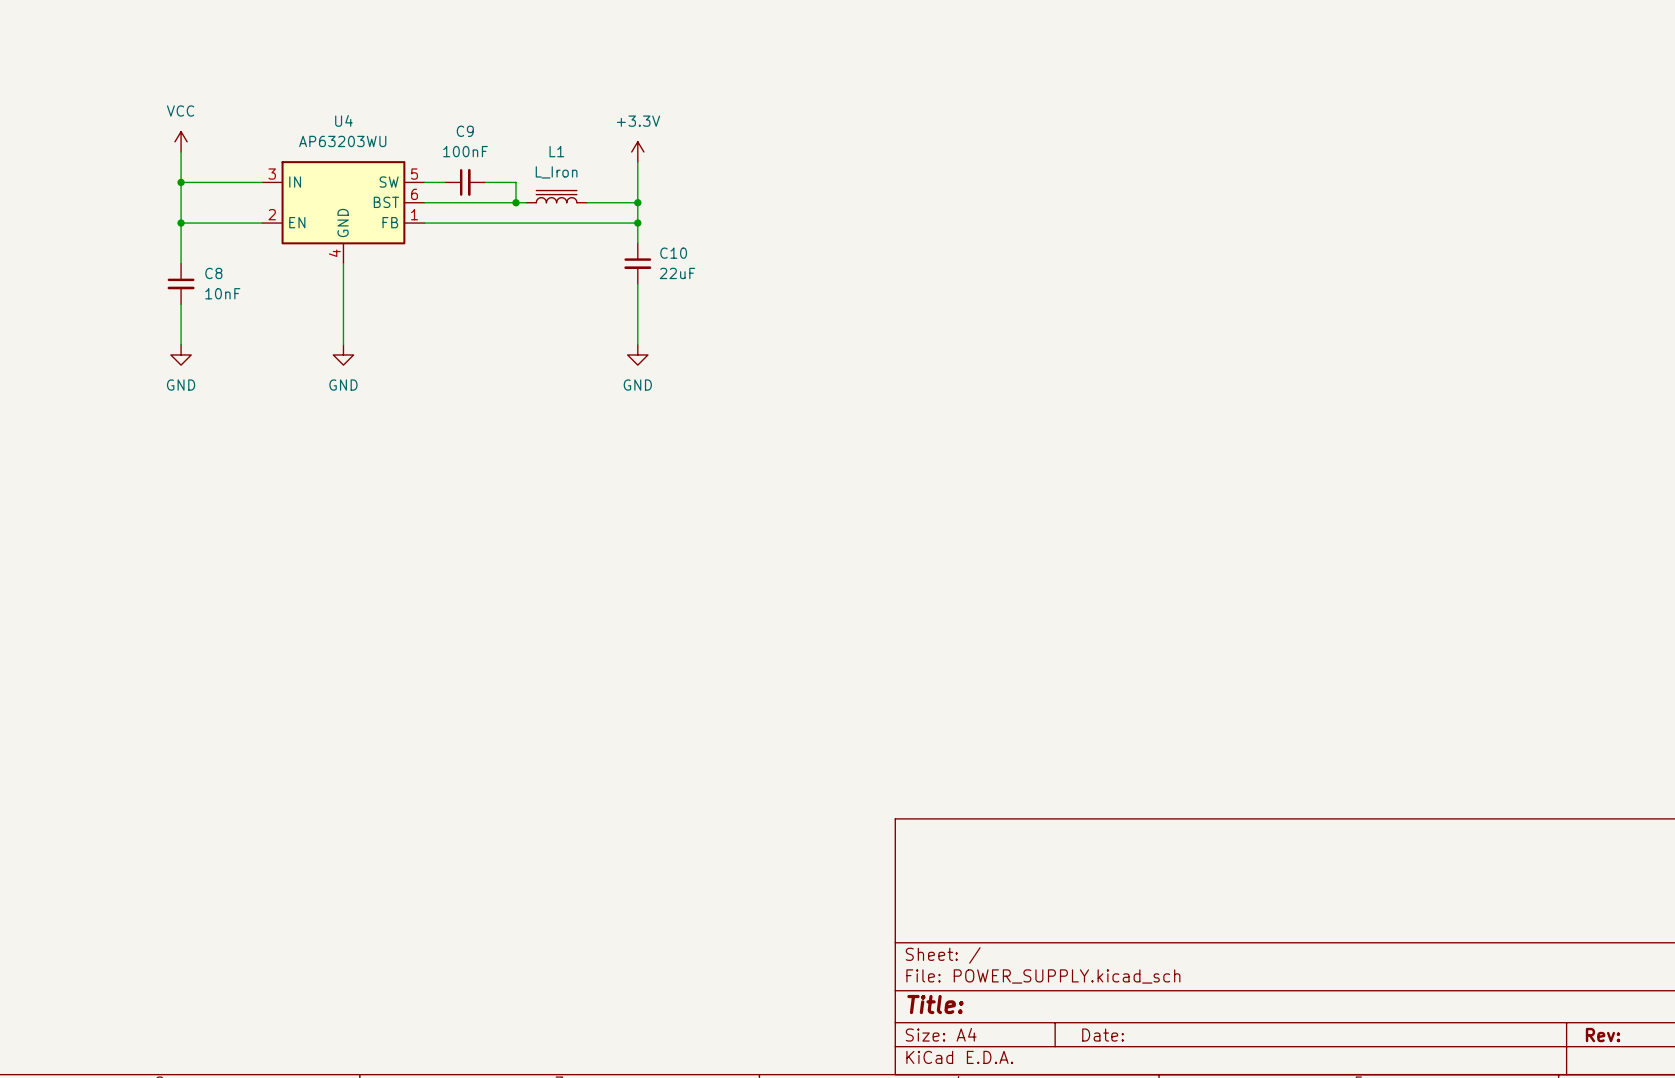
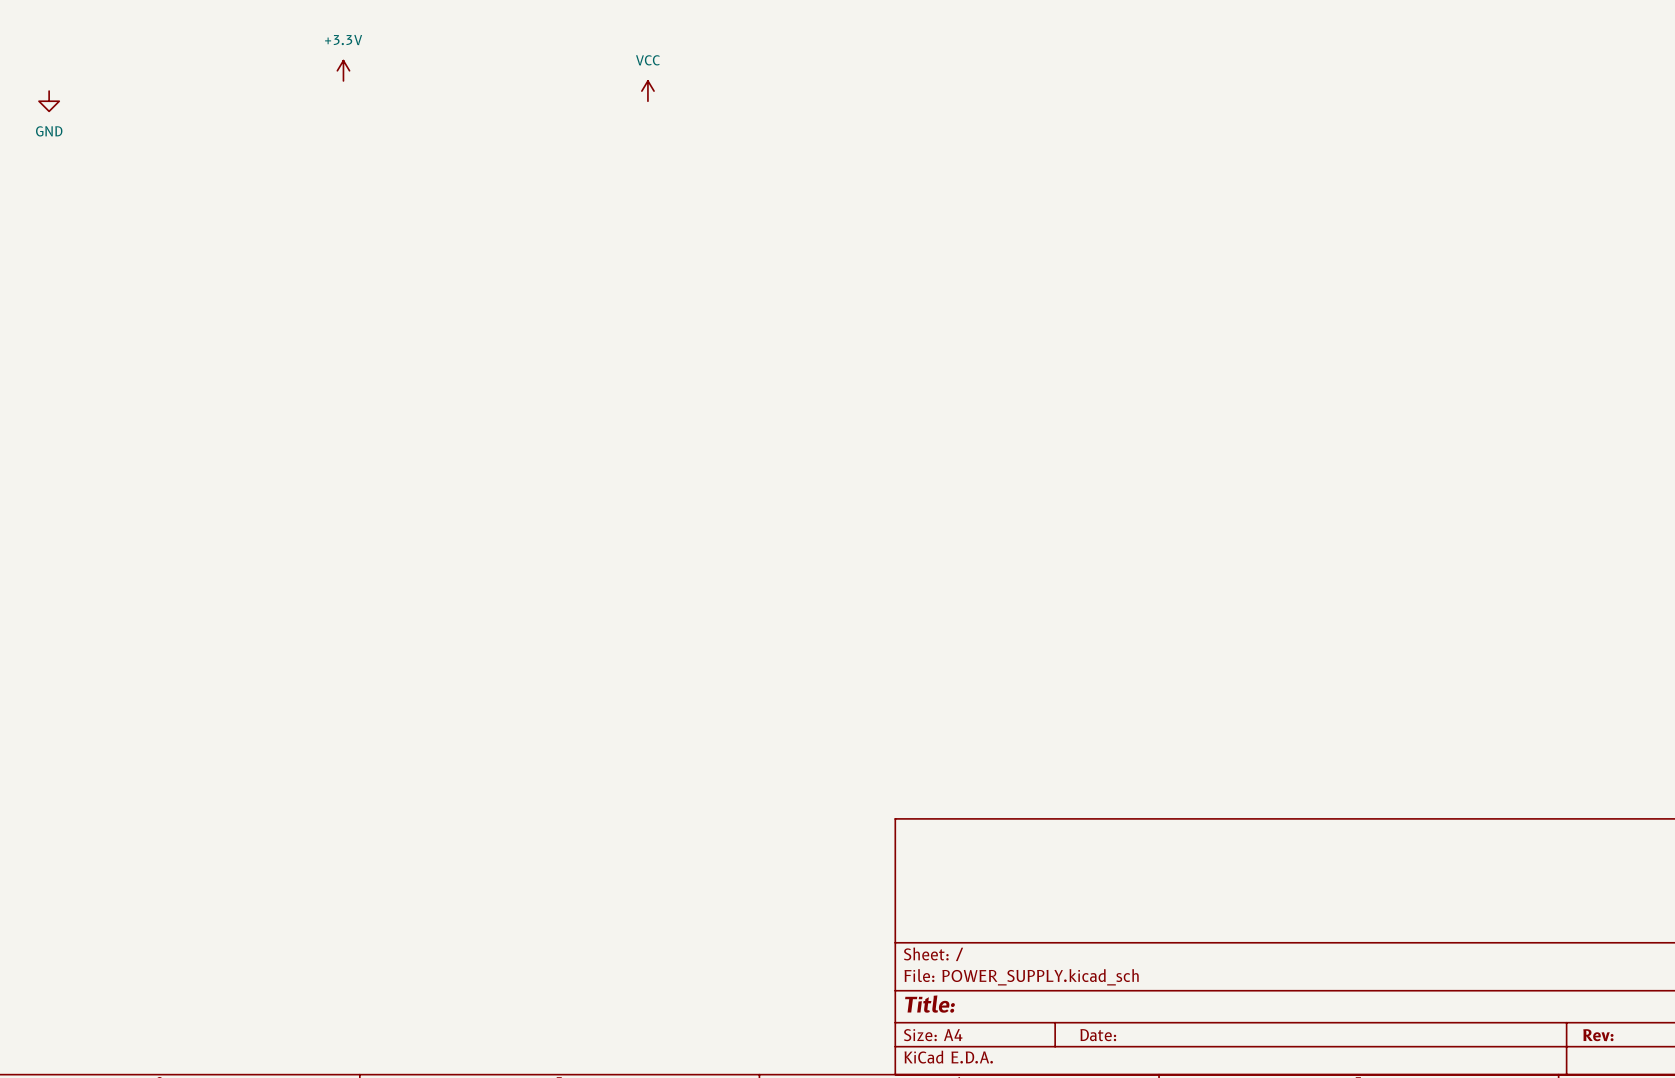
power symbol: none -> +3.3V (343, 70)
power symbol: none -> VCC (647, 91)
power symbol: none -> GND (49, 101)
power symbol: VCC (181, 141) -> none
wire: (181, 151) (181, 263) -> none
power symbol: +3.3V (637, 151) -> none
wire: (637, 162) (637, 243) -> none
wire: (181, 182) (262, 182) -> none
junction: (181, 182) -> none
wire: (424, 182) (444, 182) -> none
C9: 100nF (465, 182) -> none
wire: (485, 182) (516, 182) (516, 202) -> none
L1: L_Iron (556, 196) -> none
wire: (424, 202) (526, 202) -> none
junction: (516, 202) -> none
wire: (587, 202) (637, 202) -> none
junction: (637, 202) -> none
U4: AP63203WU (343, 212) -> none
wire: (181, 223) (262, 223) -> none
junction: (181, 223) -> none
wire: (424, 223) (637, 223) -> none
junction: (637, 223) -> none
wire: (343, 263) (343, 344) -> none
C10: 22uF (637, 263) -> none
C8: 10nF (181, 283) -> none
wire: (637, 283) (637, 344) -> none
wire: (181, 304) (181, 344) -> none
power symbol: GND (181, 354) -> none
power symbol: GND (343, 354) -> none
power symbol: GND (637, 354) -> none

